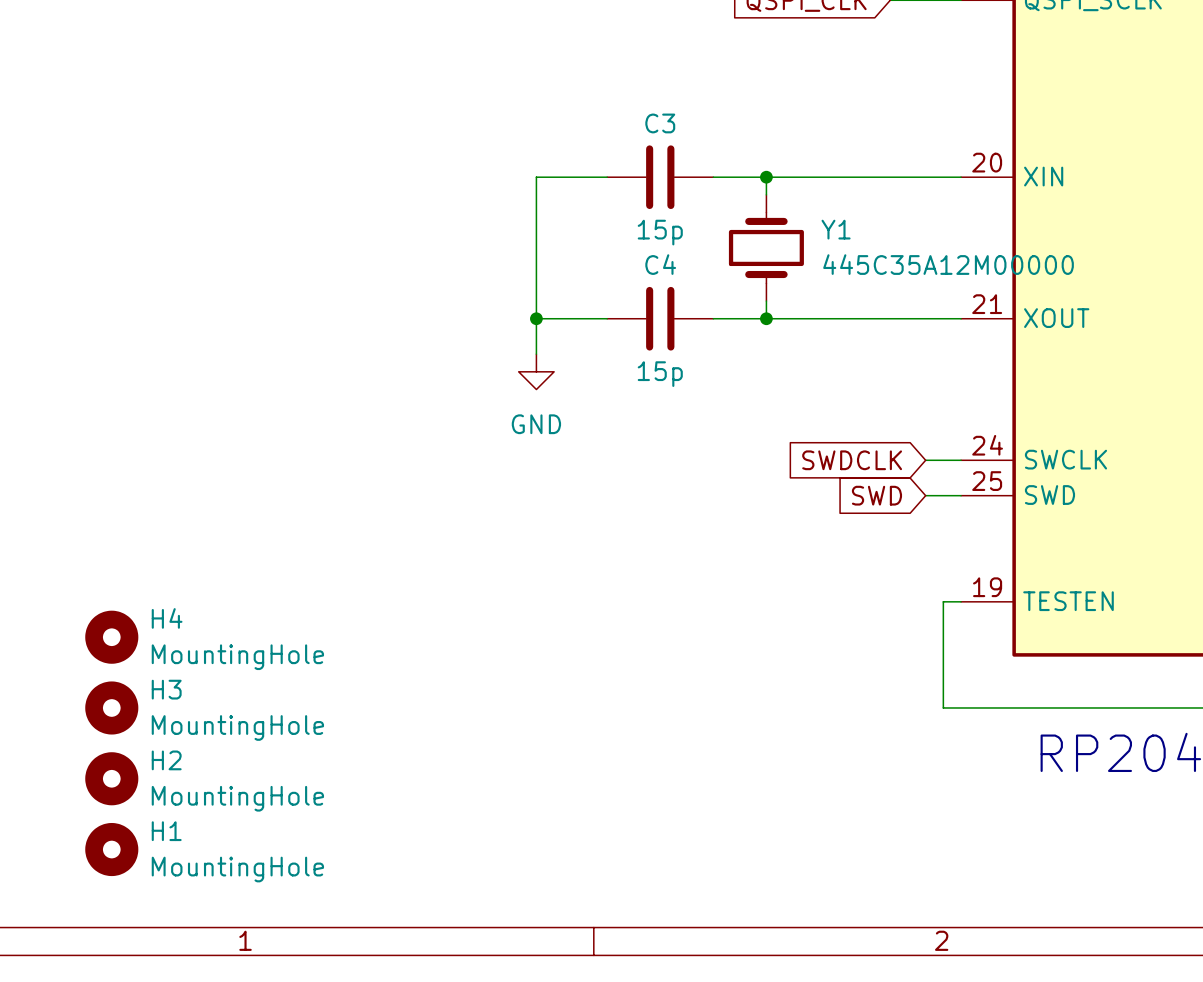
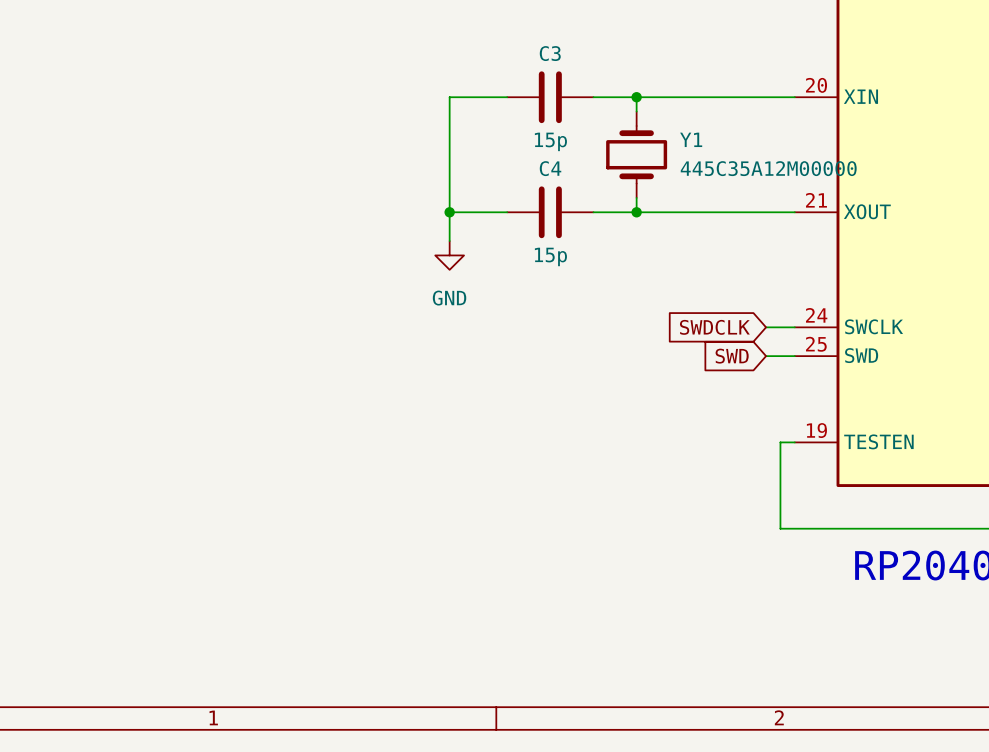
H4: MountingHole (111, 637) -> none
H3: MountingHole (111, 707) -> none
H2: MountingHole (111, 778) -> none
H1: MountingHole (111, 849) -> none

